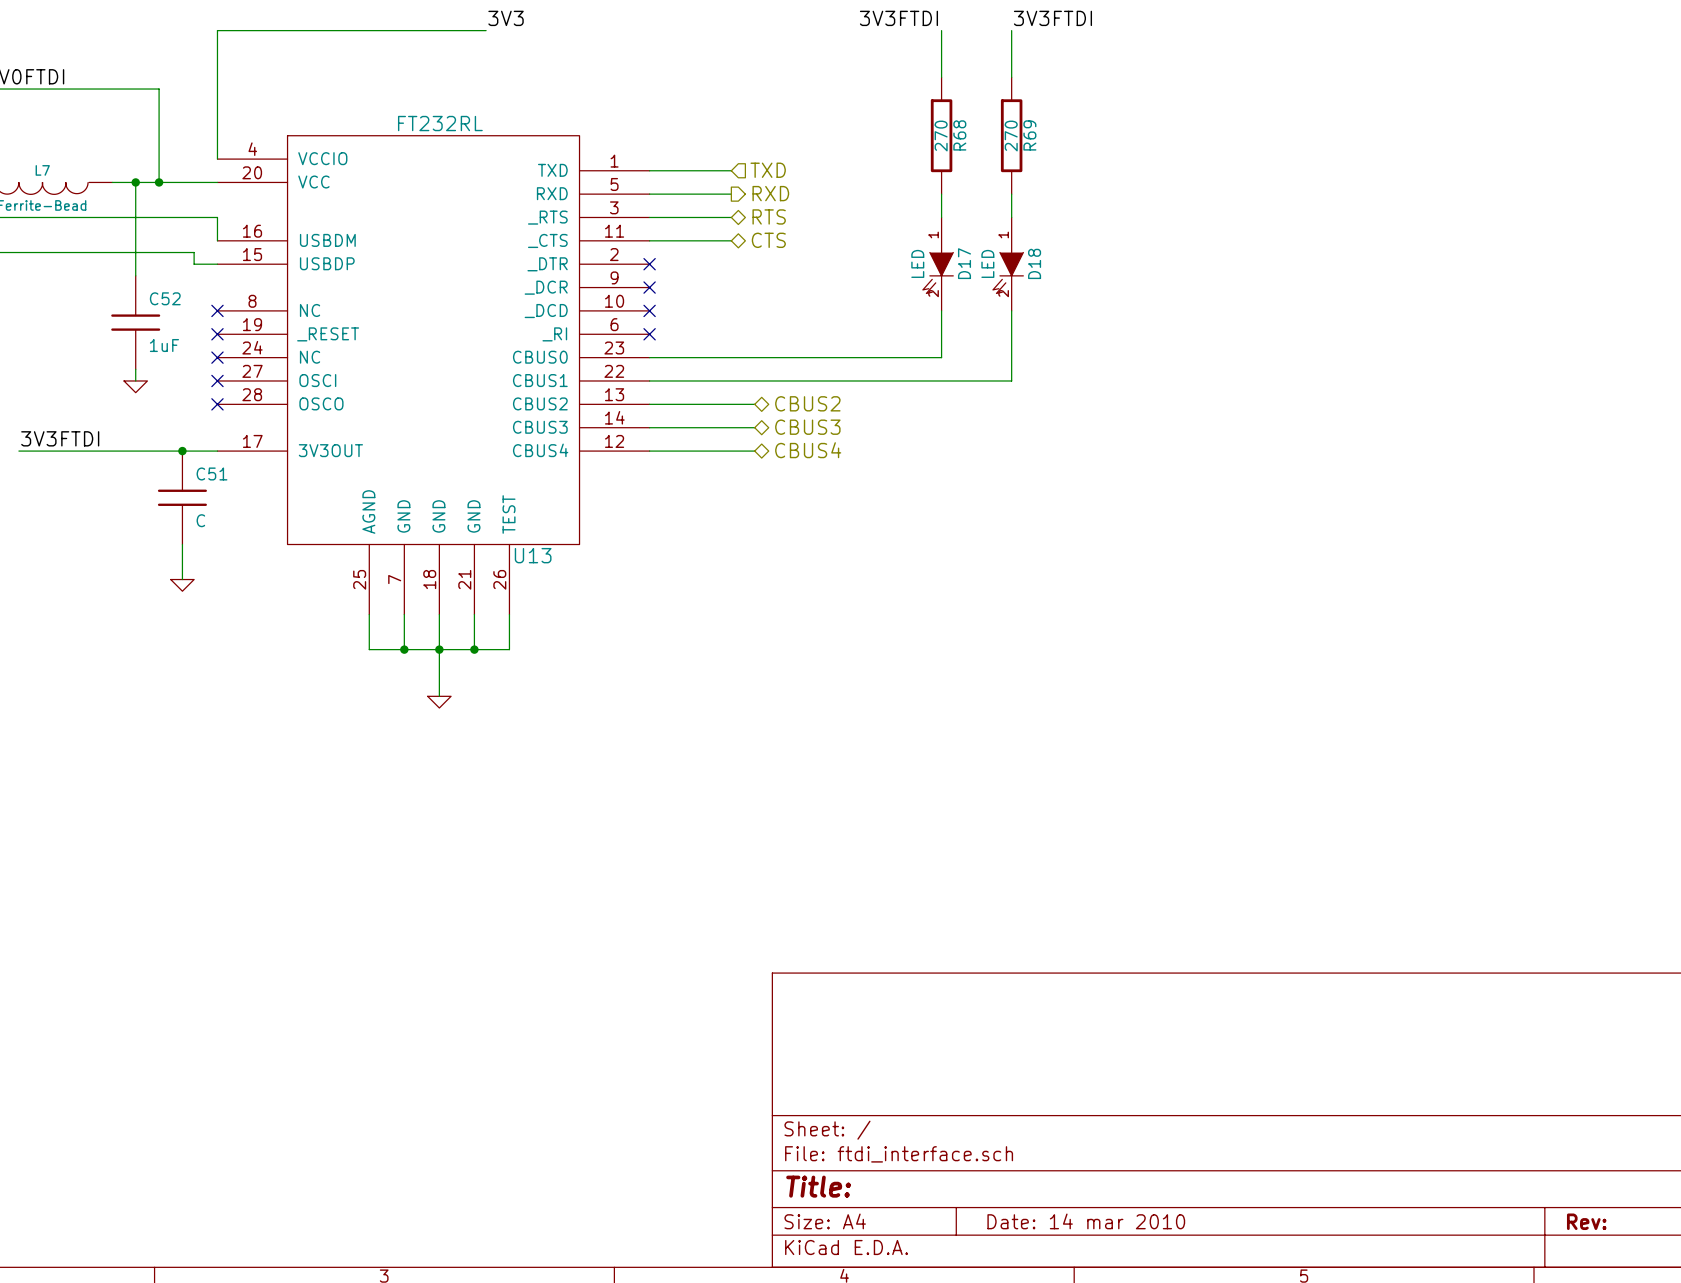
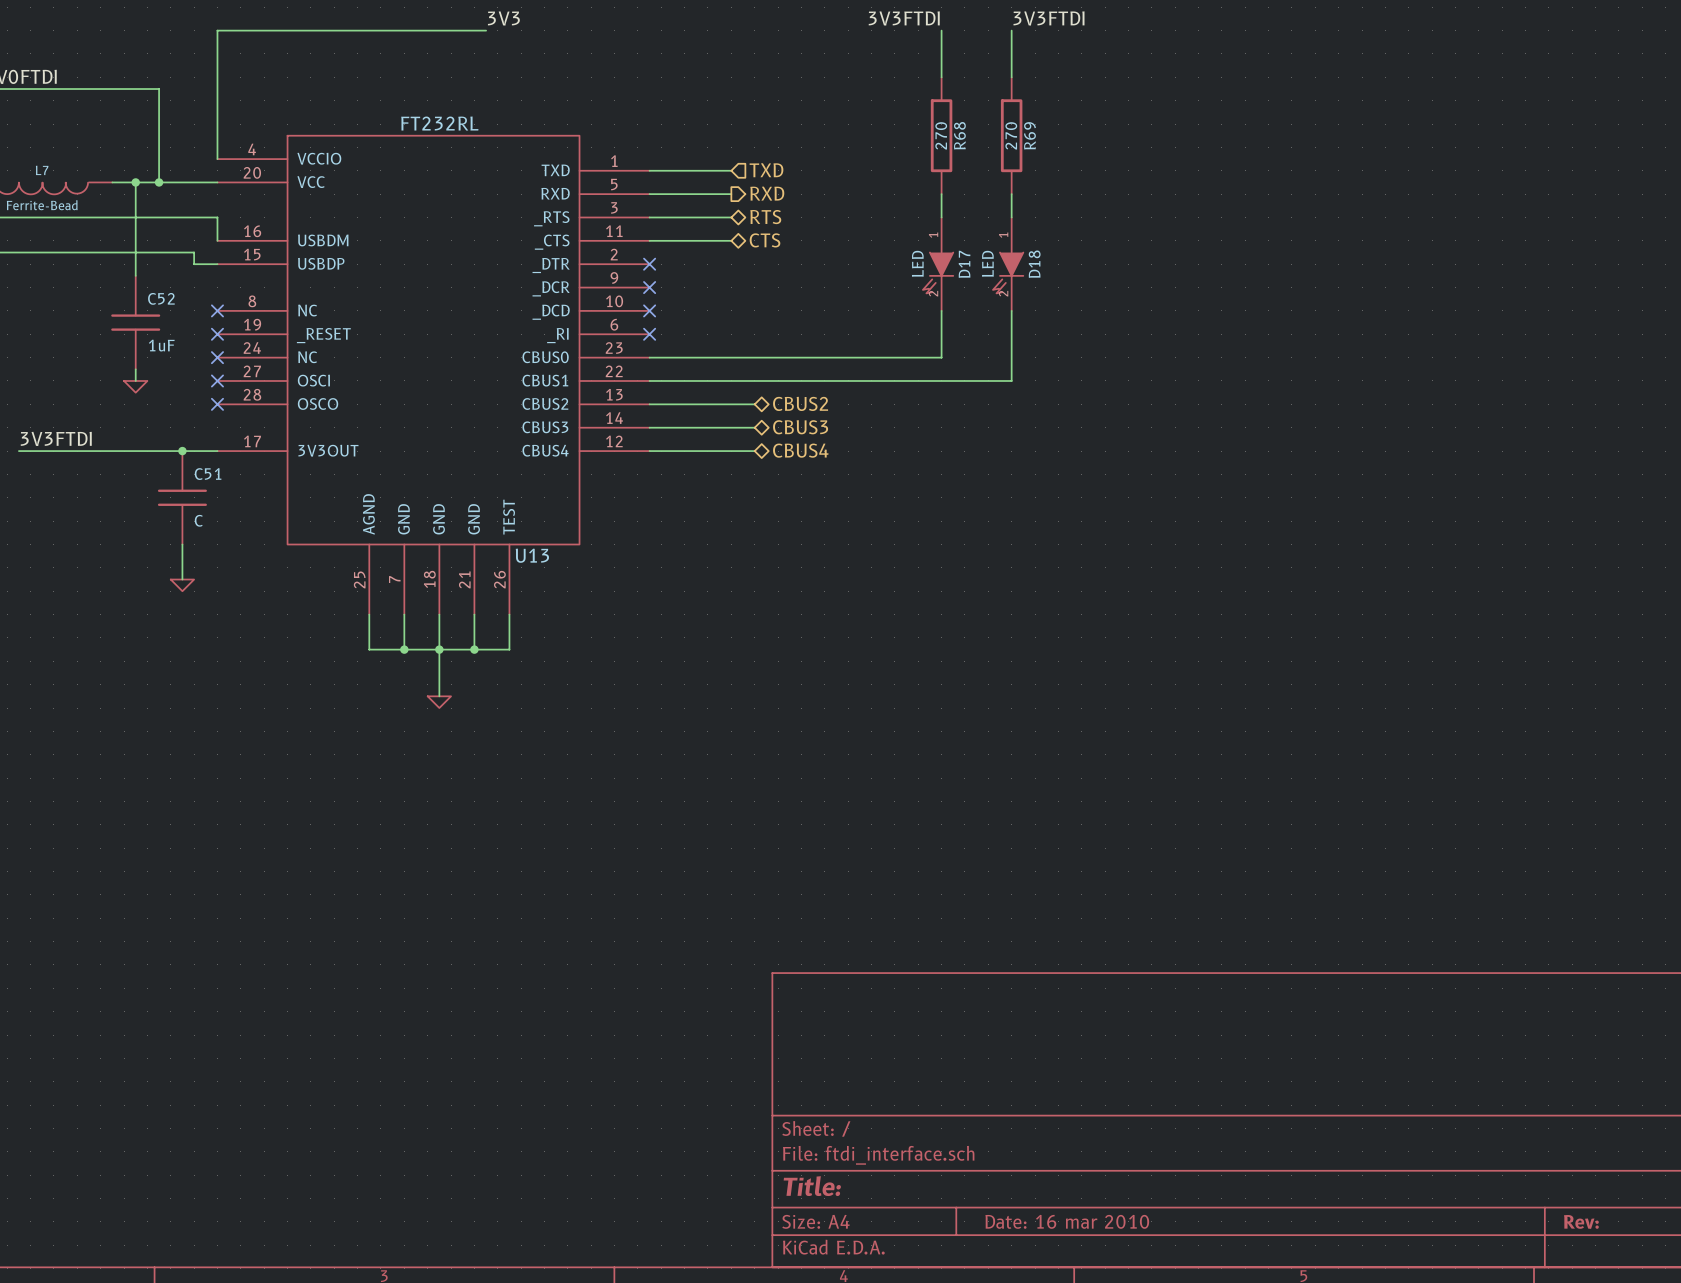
title block: Date: 14 mar 2010 (1086, 1221) -> Date: 16 mar 2010 (1067, 1221)

